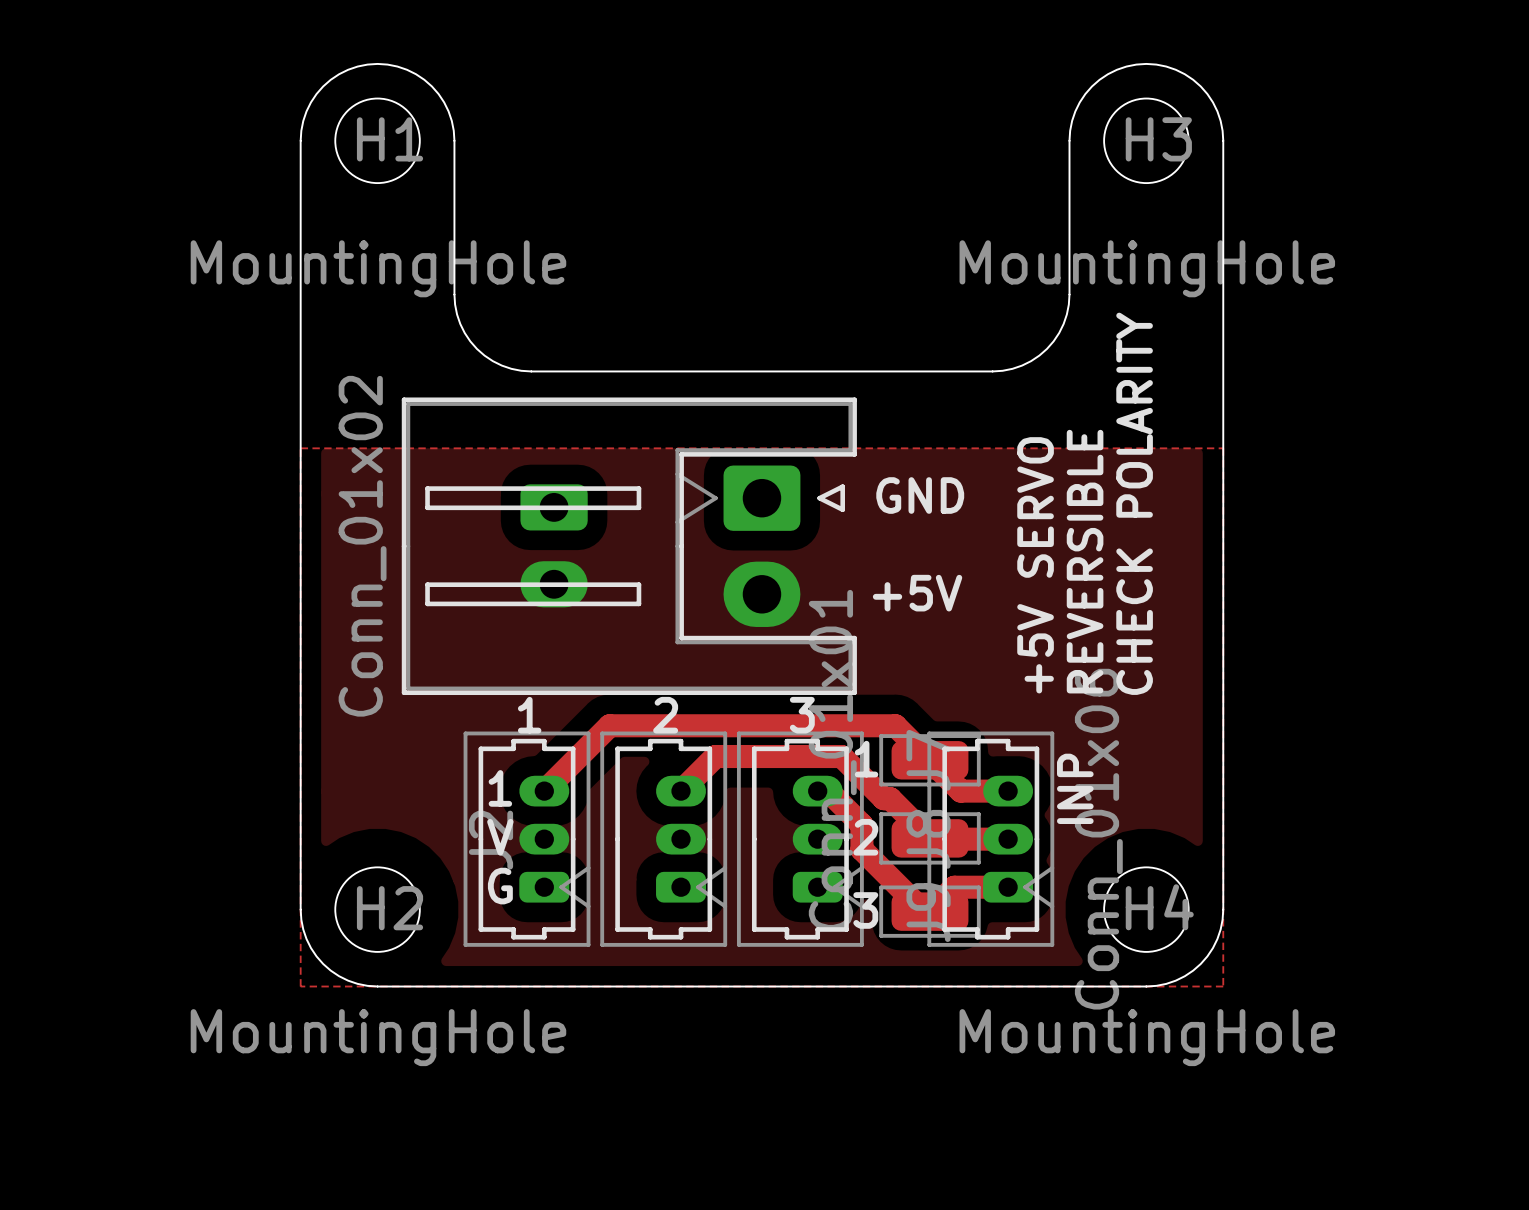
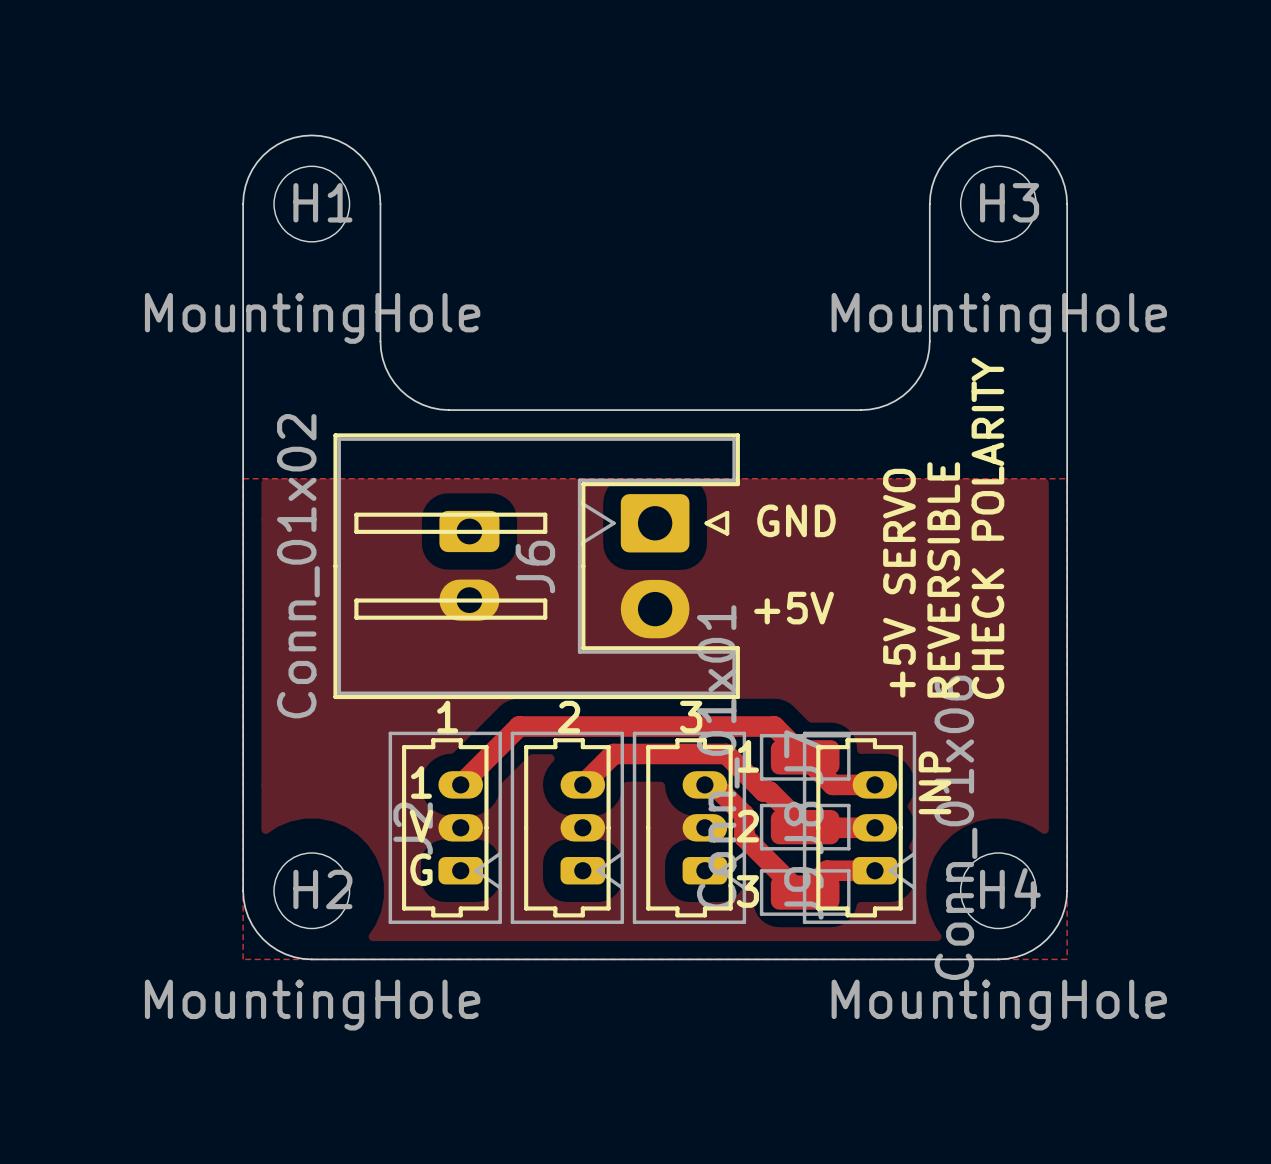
J6 name: none -> J6 (535, 567)

